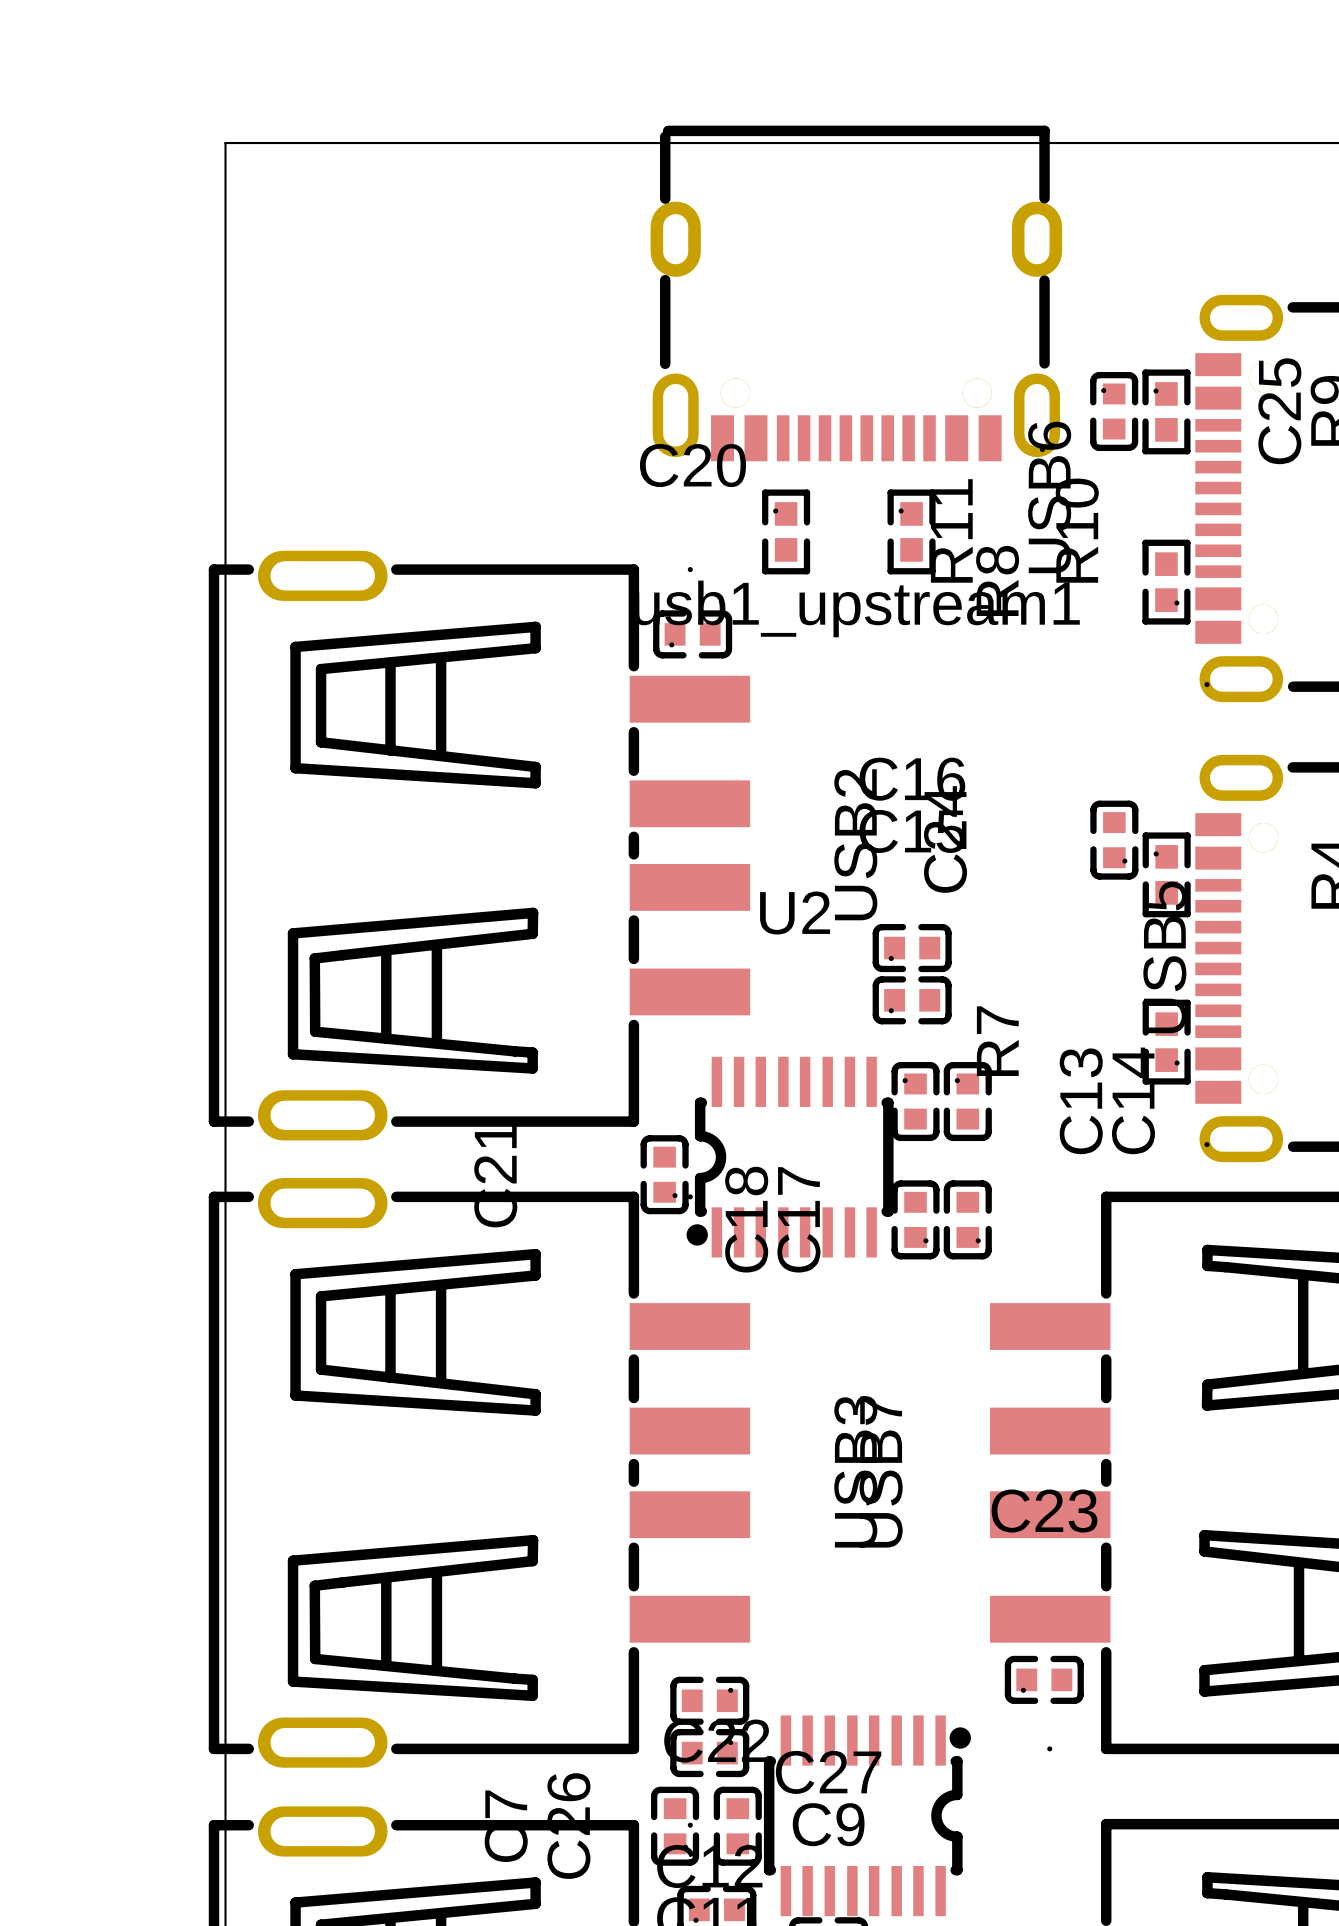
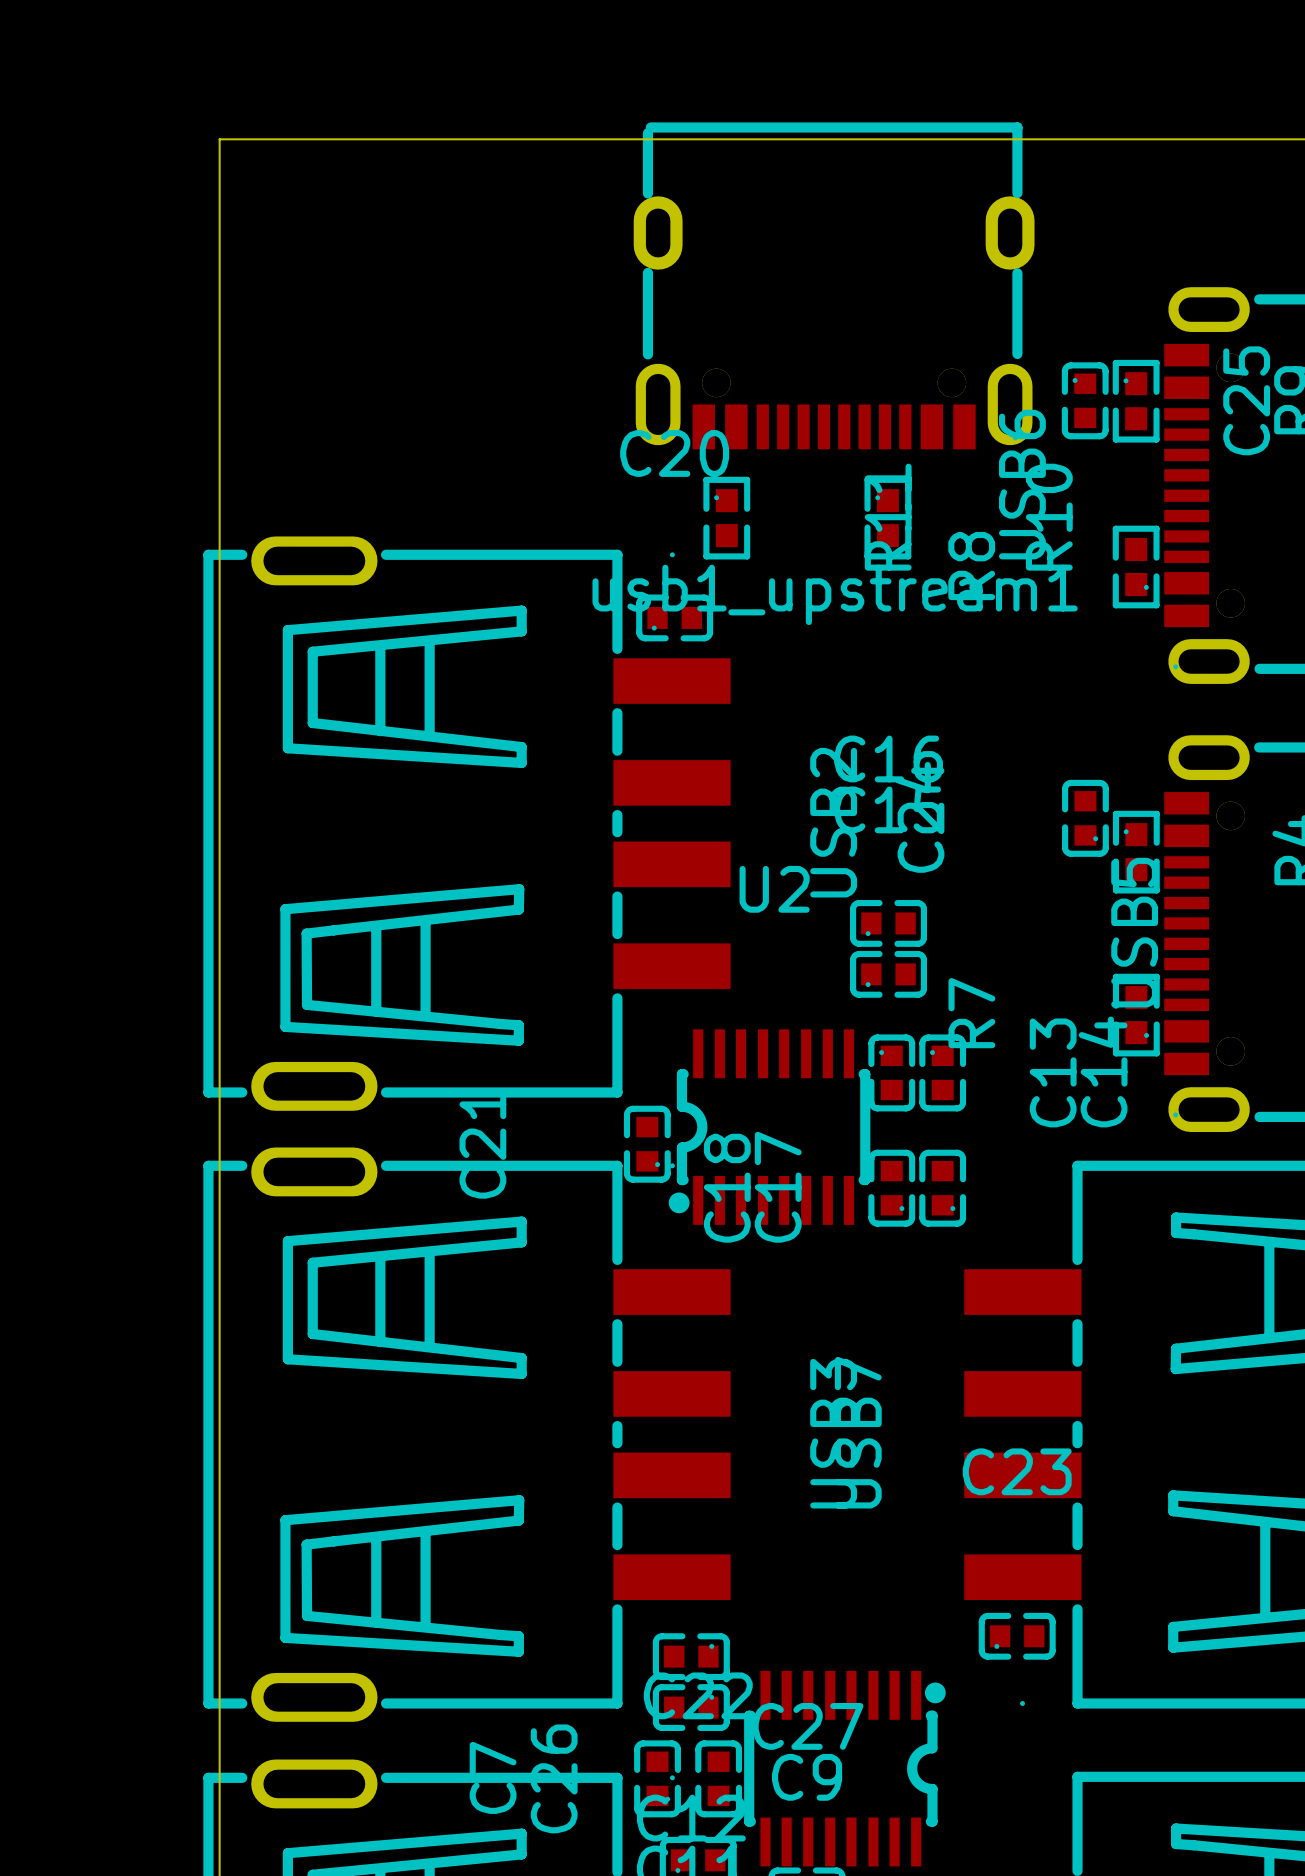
R11 position: (786, 531) -> (726, 518)

